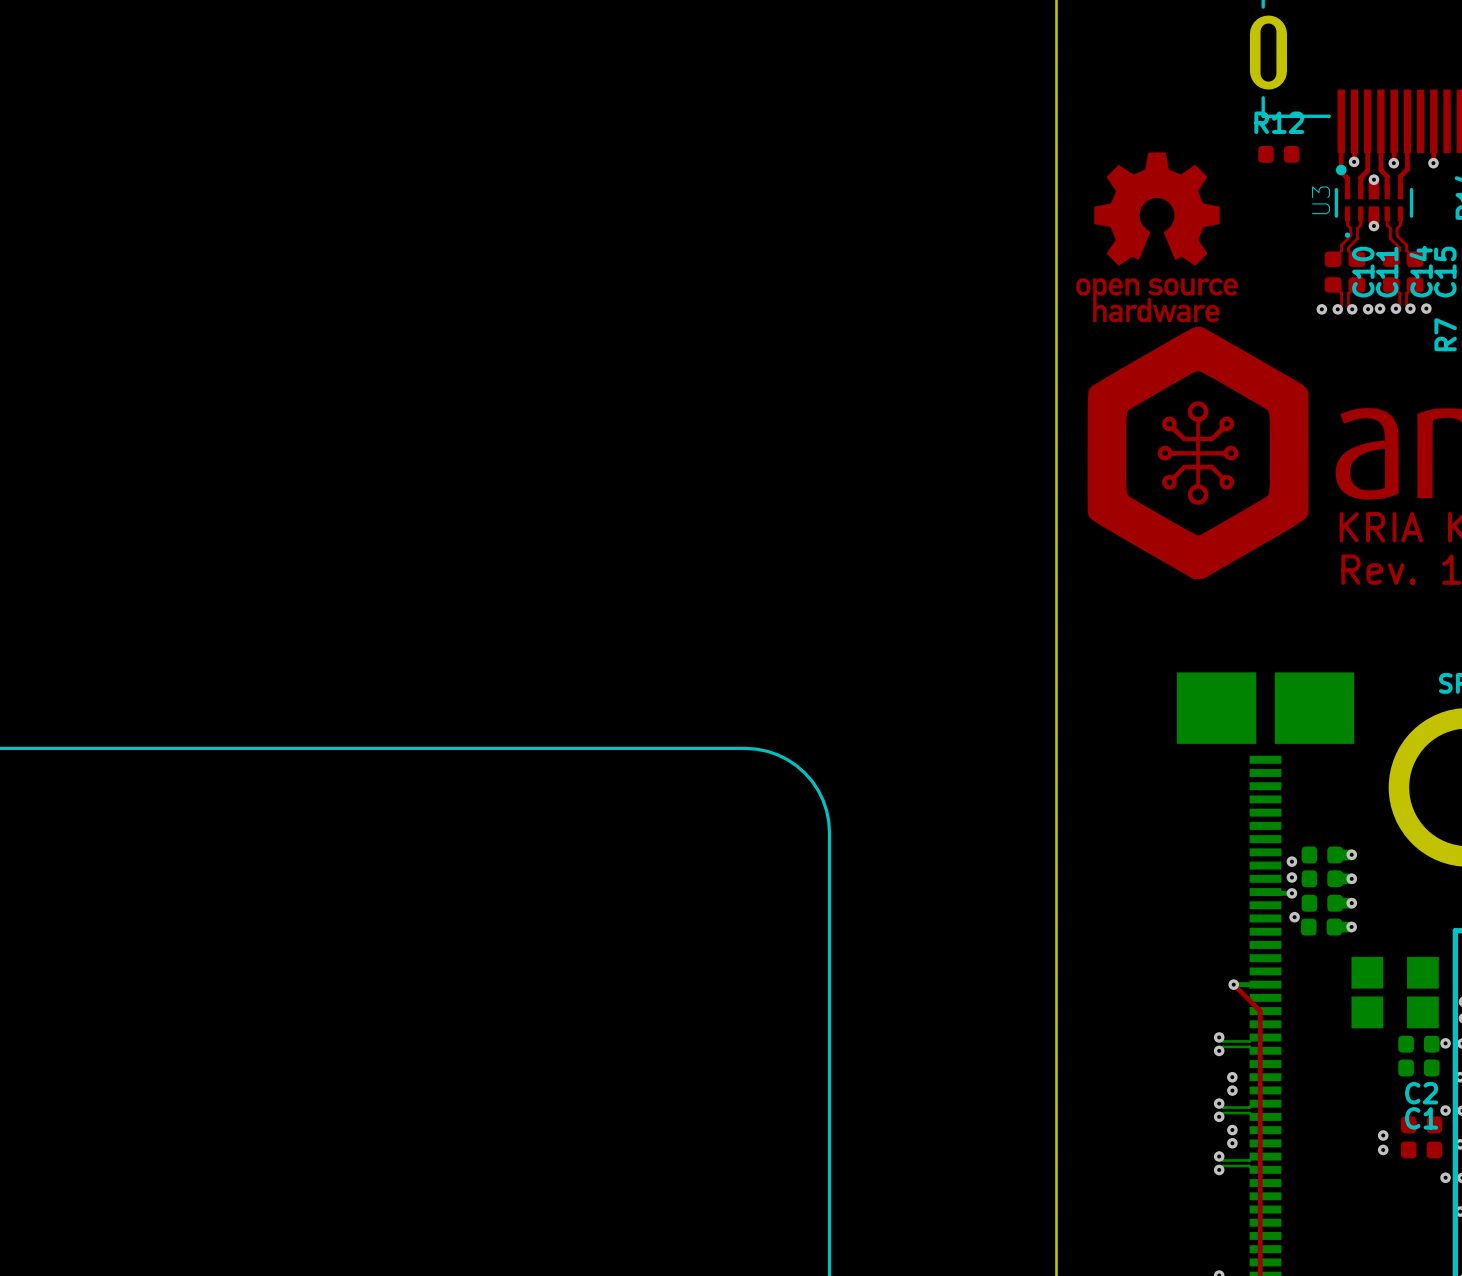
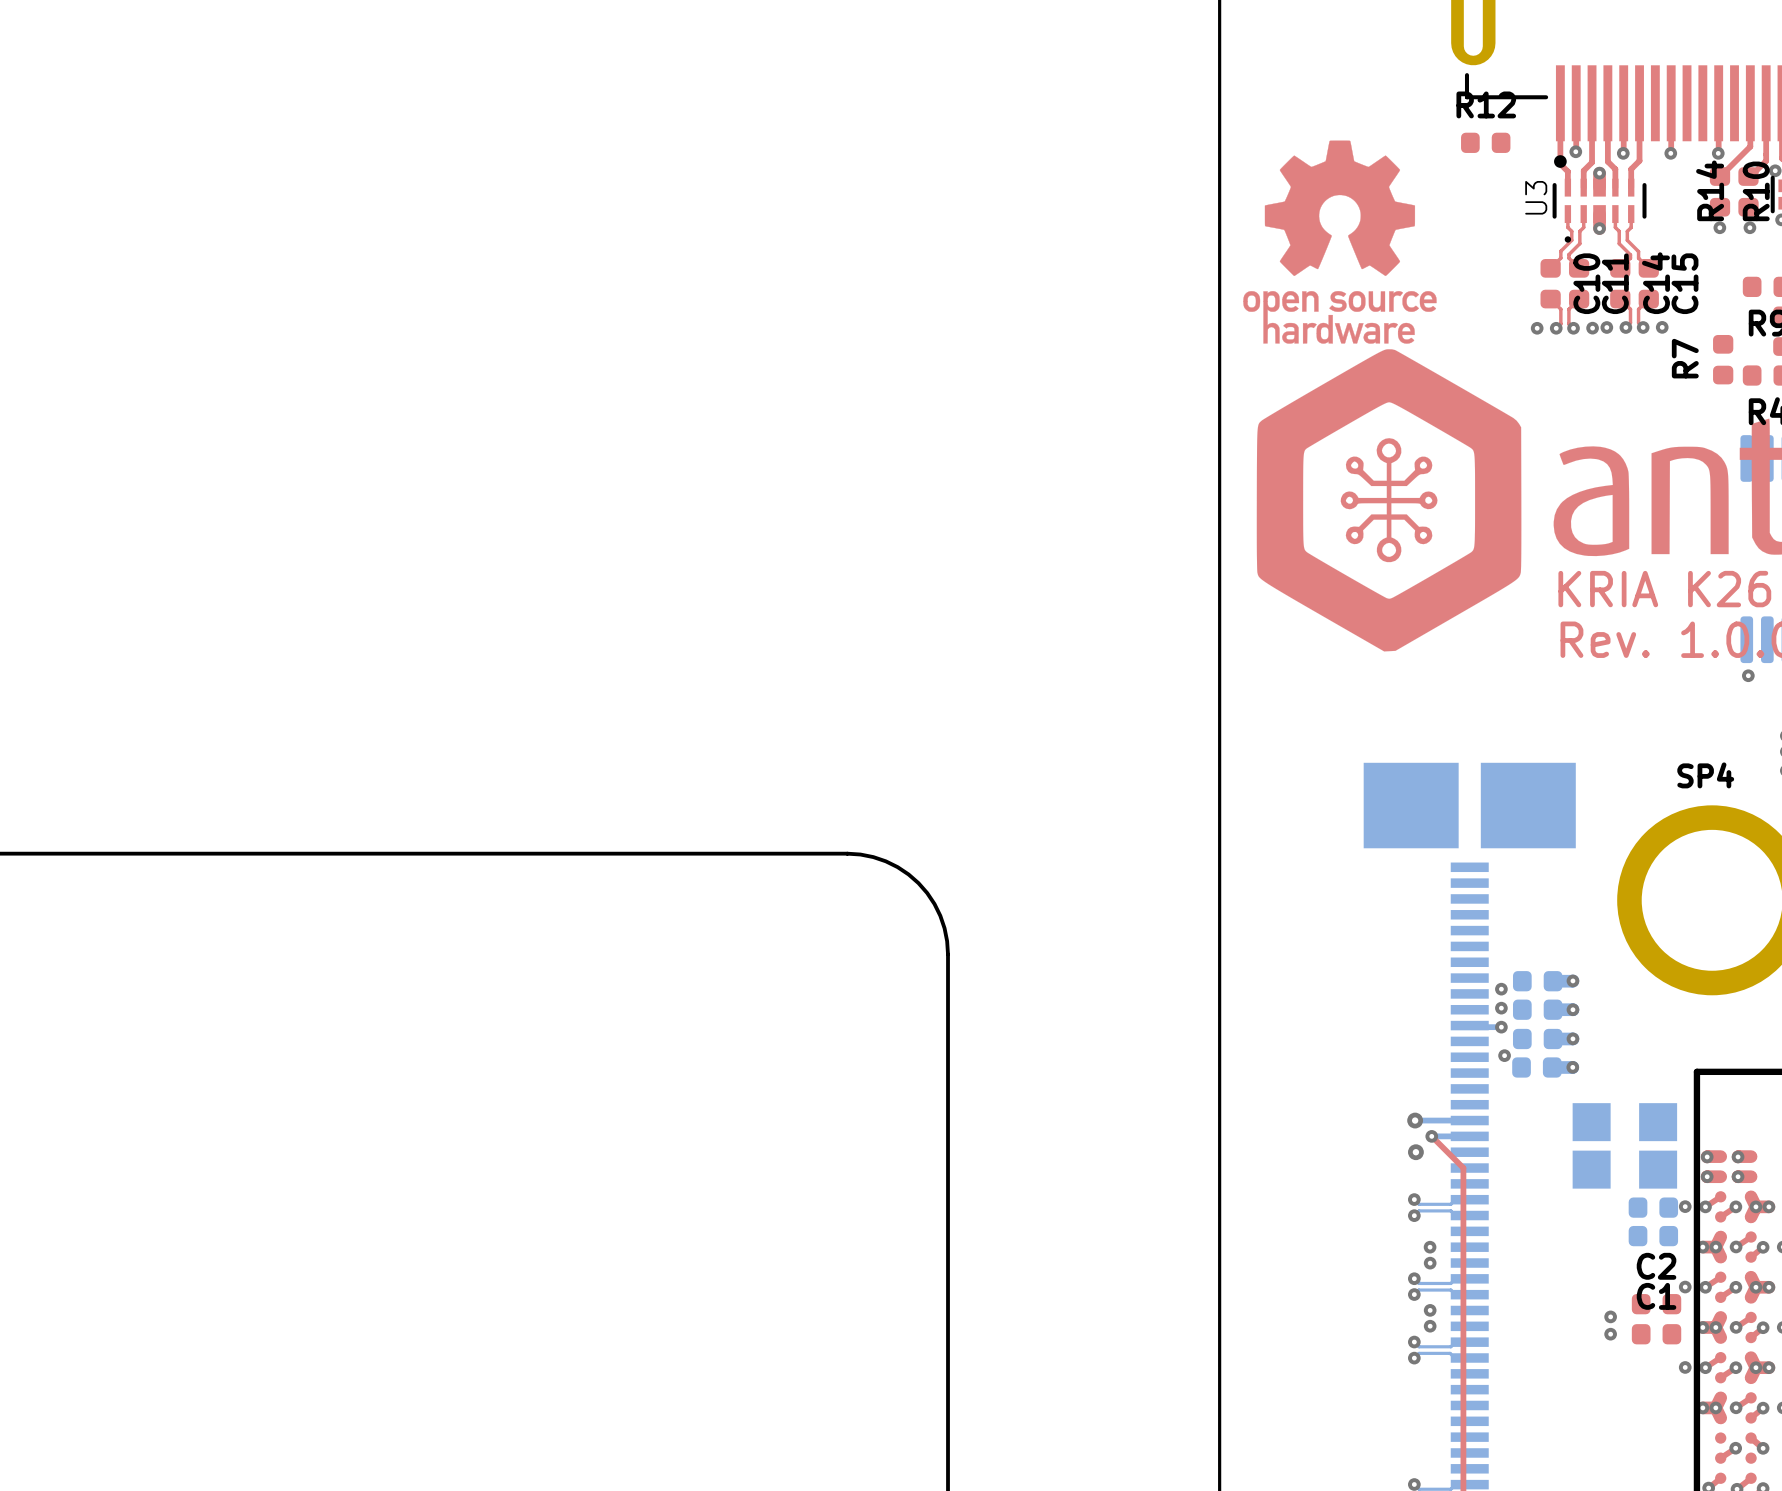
bottom track: none -> (1415, 1120) (1469, 1120)
via: none -> (1415, 1120)
via: none -> (1415, 1152)

